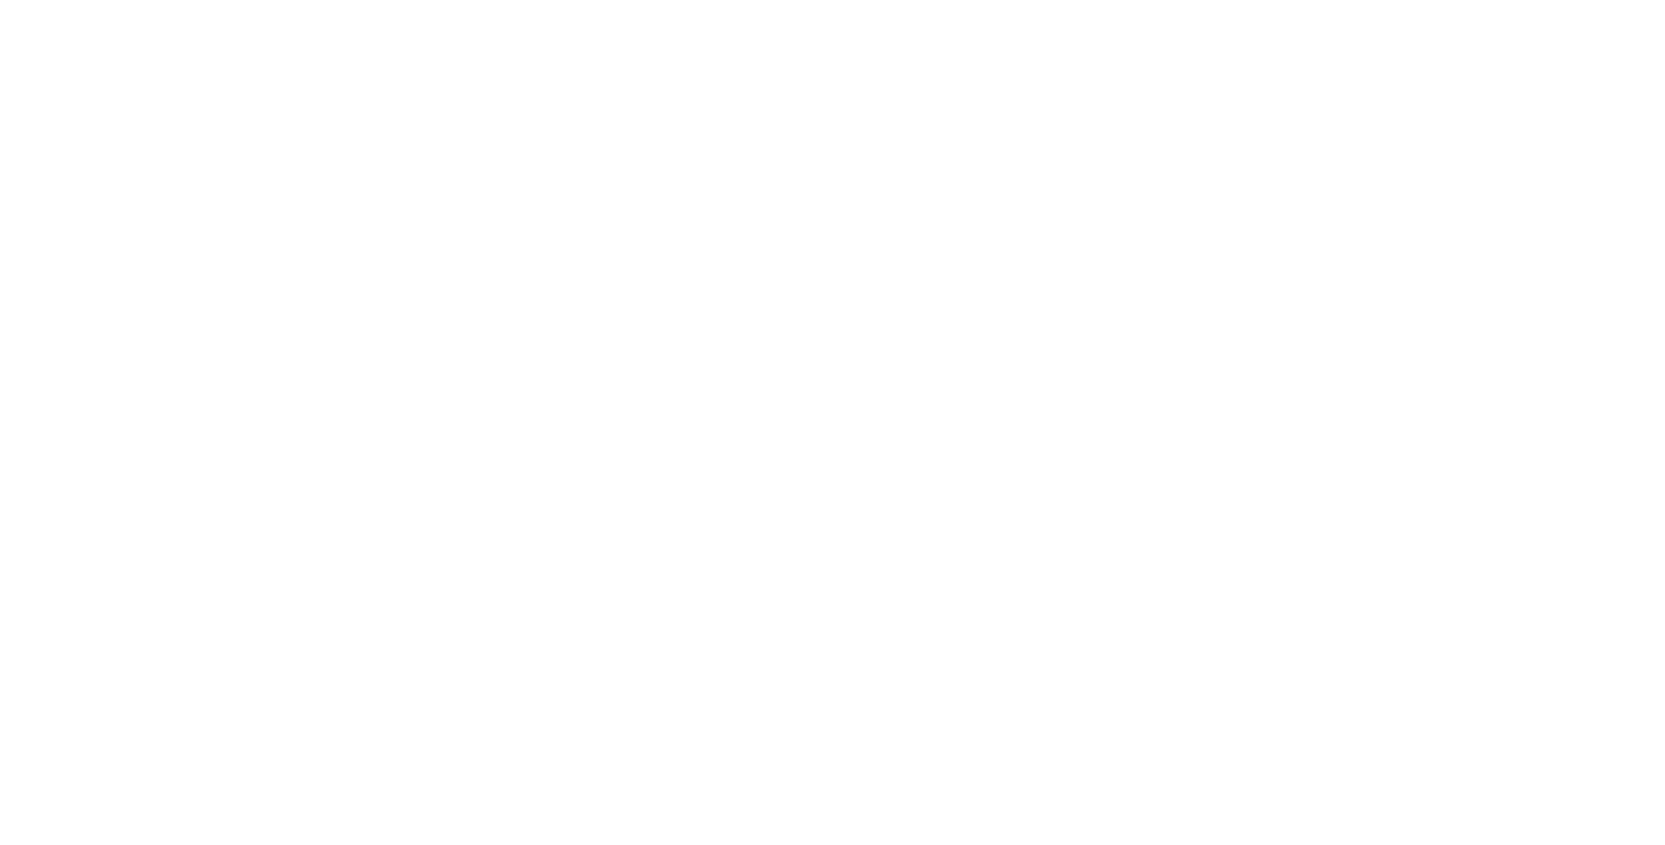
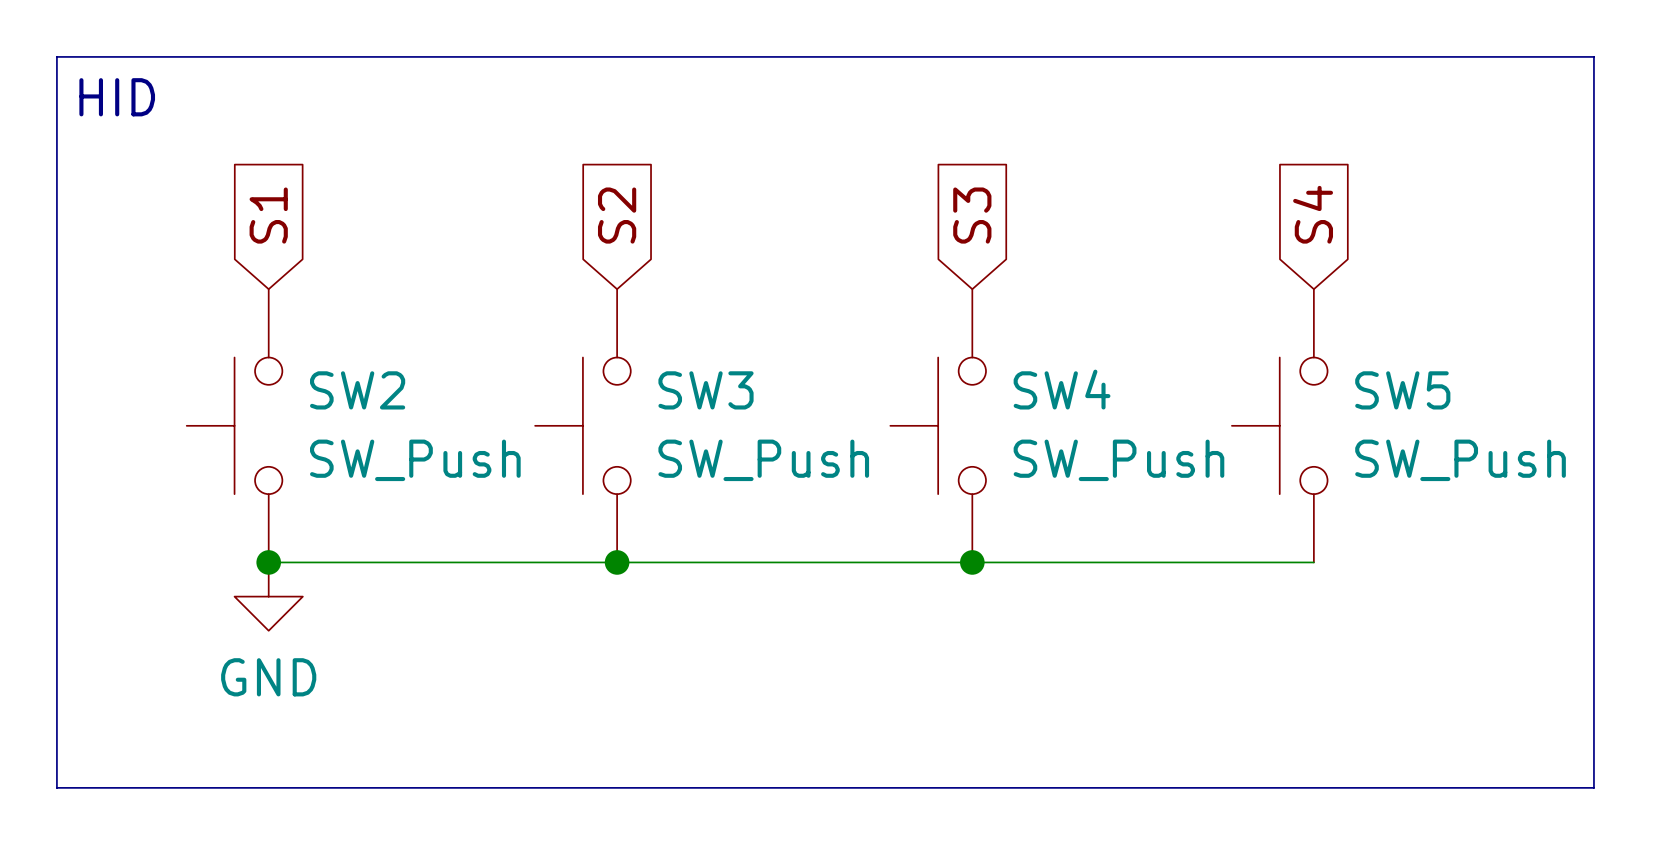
line: none -> (56, 56) (1593, 56) (1593, 787) (56, 787) (56, 56)
text: none -> HID (117, 97)
global label: none -> S4 (1313, 214)
global label: none -> S1 (268, 215)
global label: none -> S2 (617, 215)
global label: none -> S3 (972, 215)
SW2: none -> SW_Push (234, 425)
SW3: none -> SW_Push (582, 425)
SW4: none -> SW_Push (938, 425)
SW5: none -> SW_Push (1279, 425)
wire: none -> (268, 562) (1313, 562)
junction: none -> (268, 562)
junction: none -> (617, 562)
junction: none -> (972, 562)
power symbol: none -> GND (268, 596)

